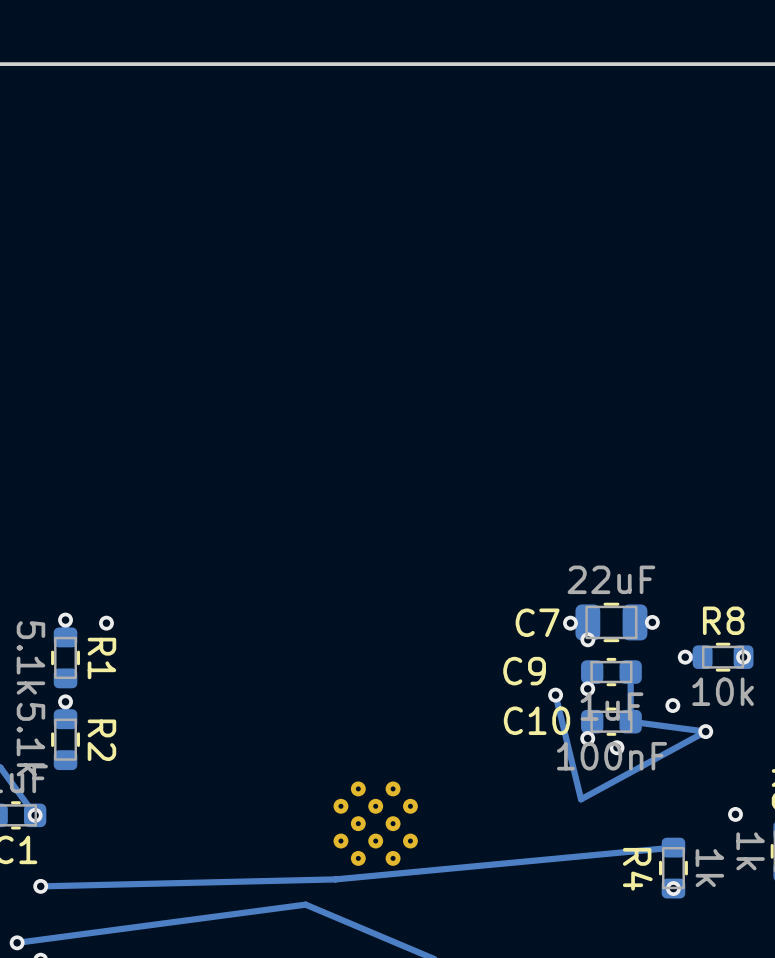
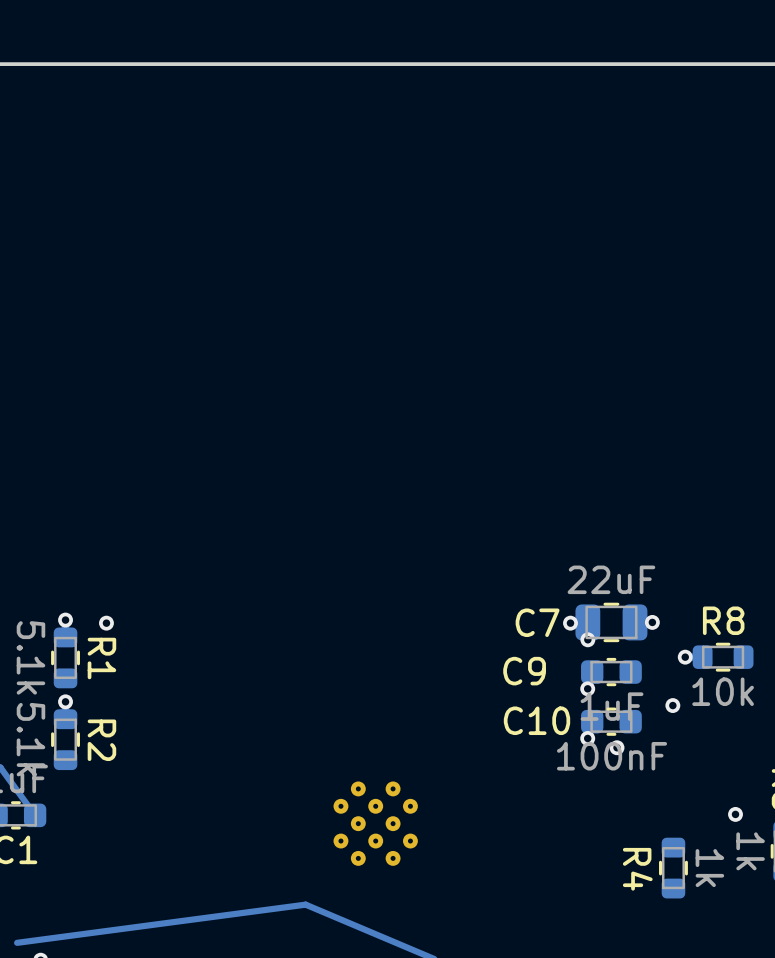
via: (743, 657) -> none
track: (630, 672) (630, 721) (705, 731) (581, 799) (555, 695) -> none
via: (555, 695) -> none
via: (705, 731) -> none
via: (35, 815) -> none
track: (673, 847) (335, 879) (40, 886) -> none
via: (40, 886) -> none
via: (673, 888) -> none
via: (17, 942) -> none

